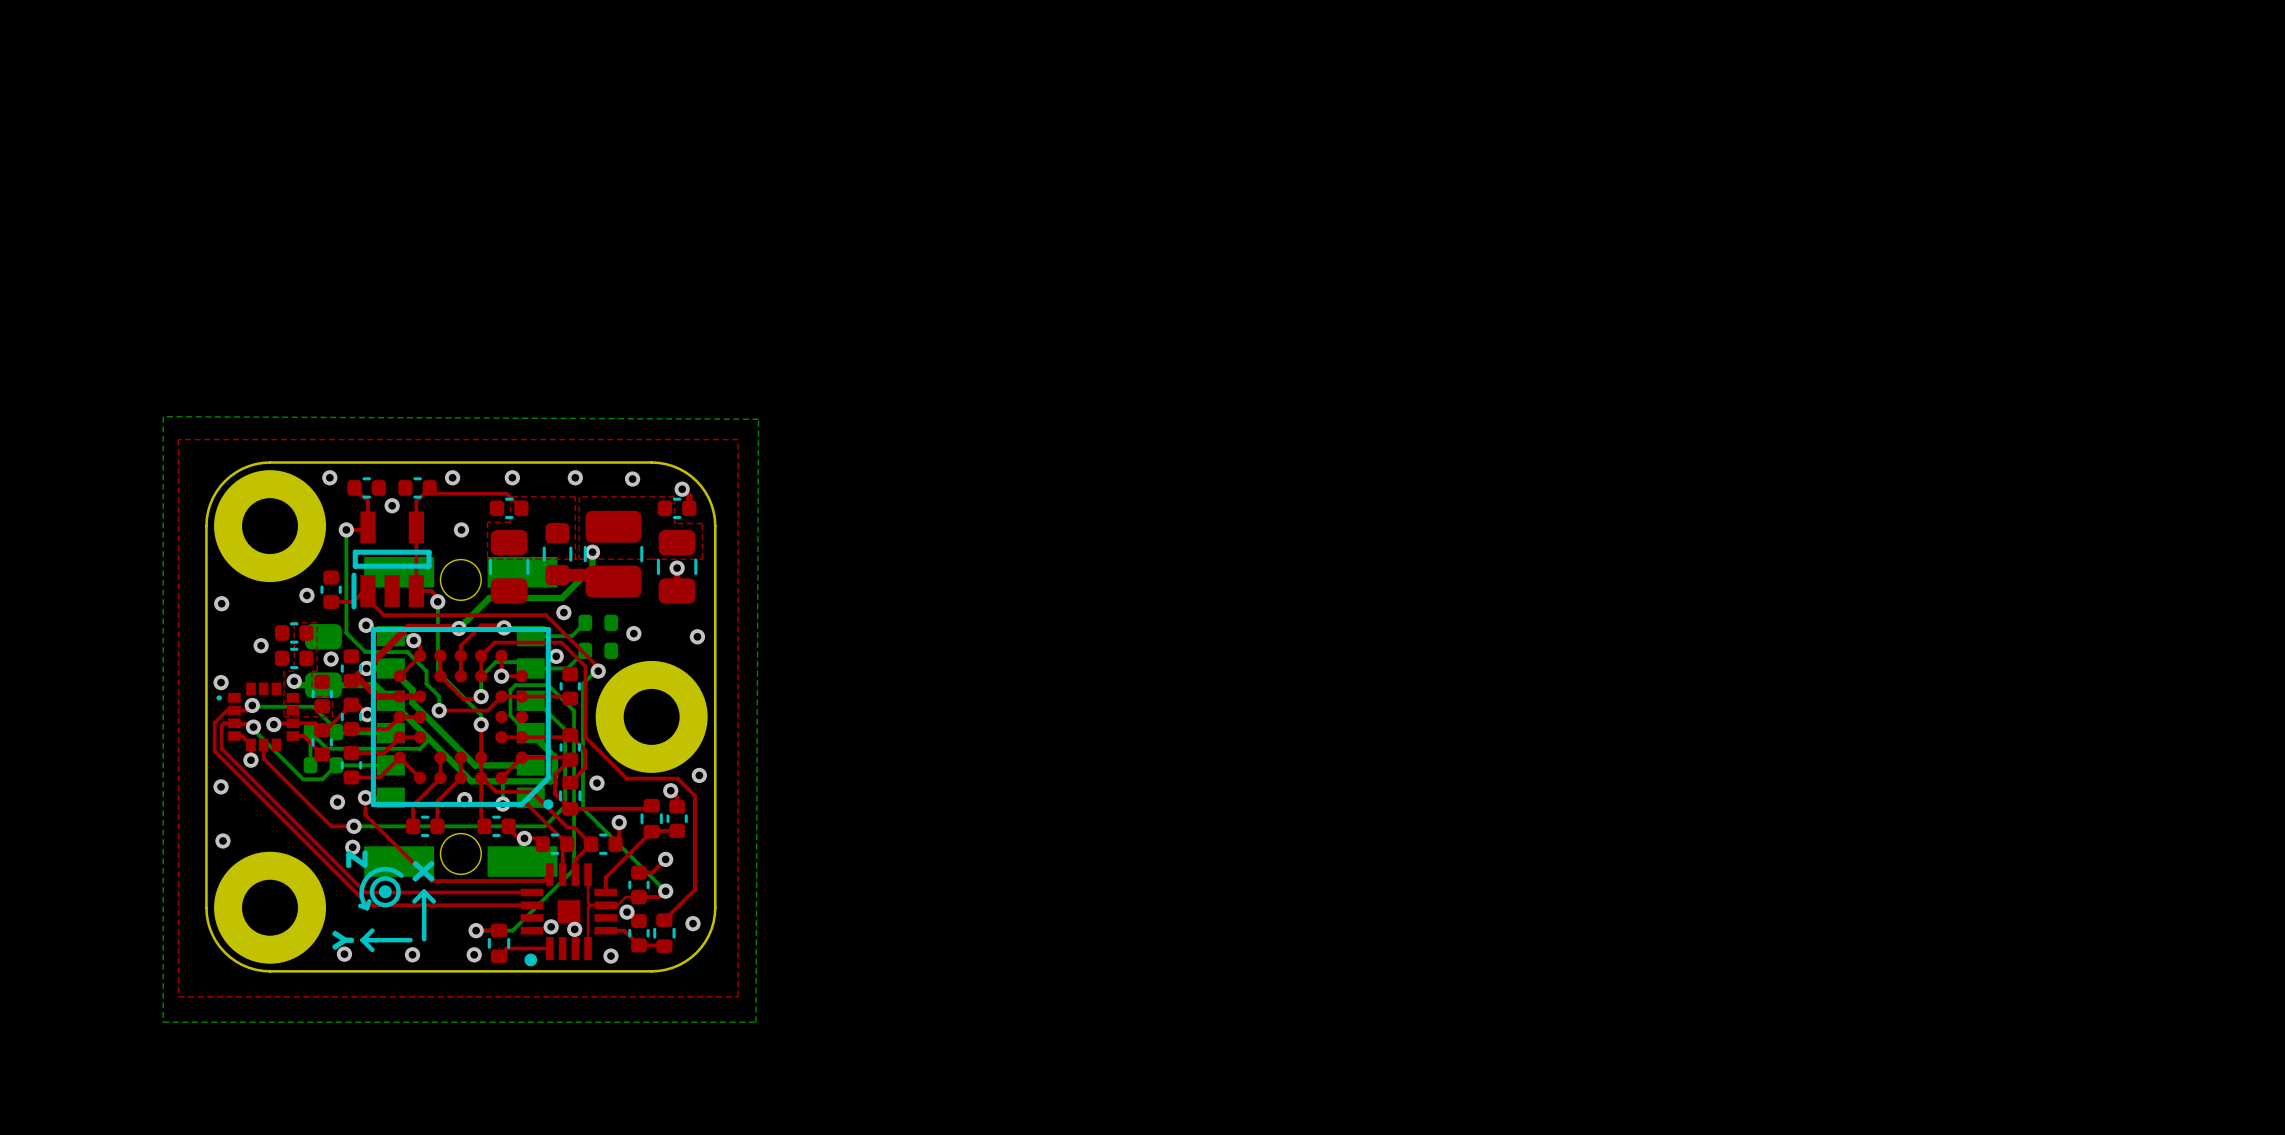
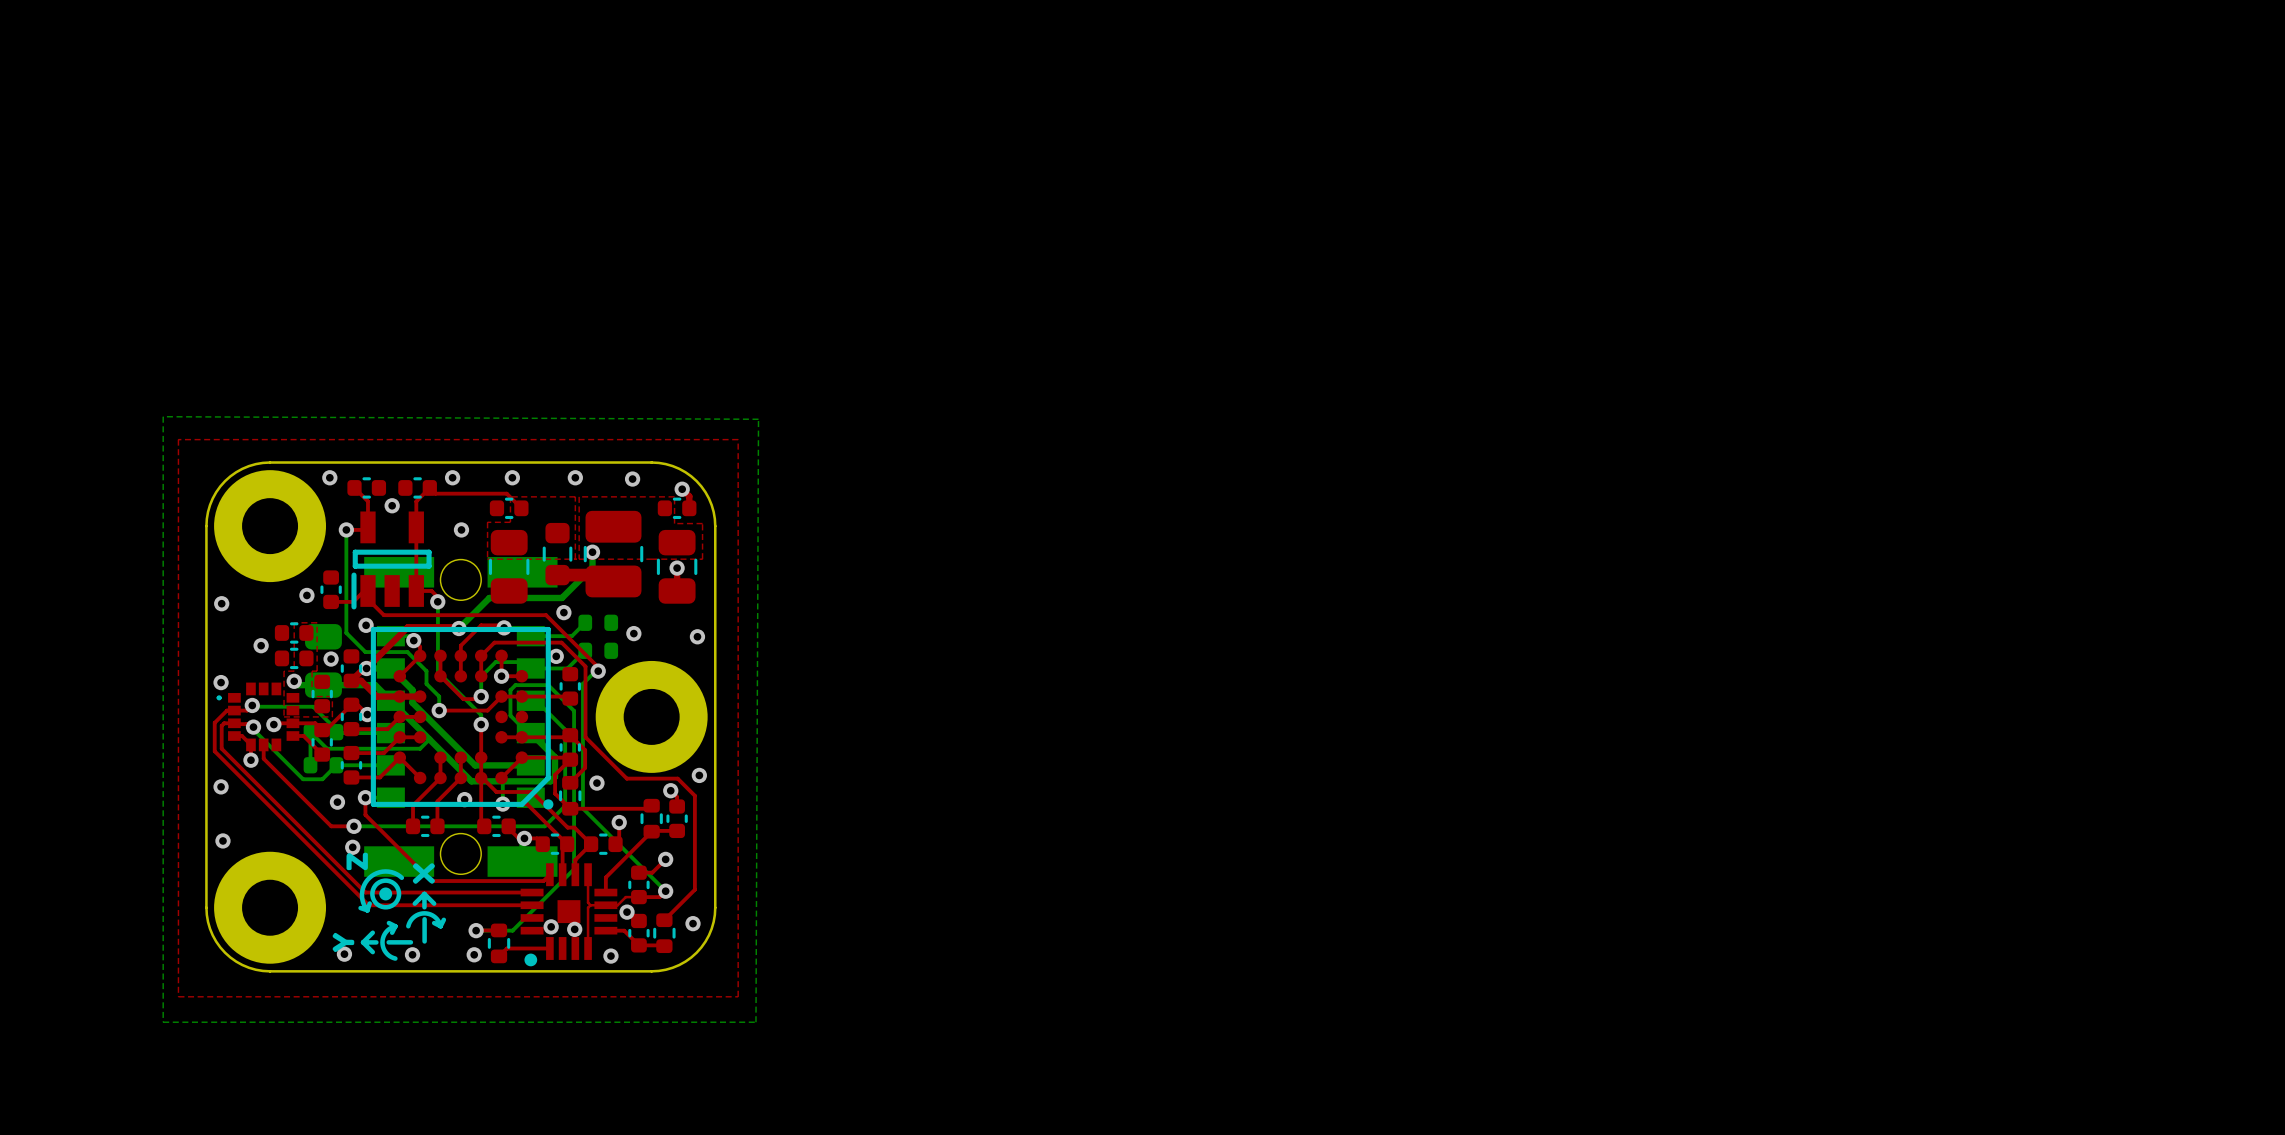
drawing shape: [332, 850, 437, 953] -> [332, 852, 447, 961]

